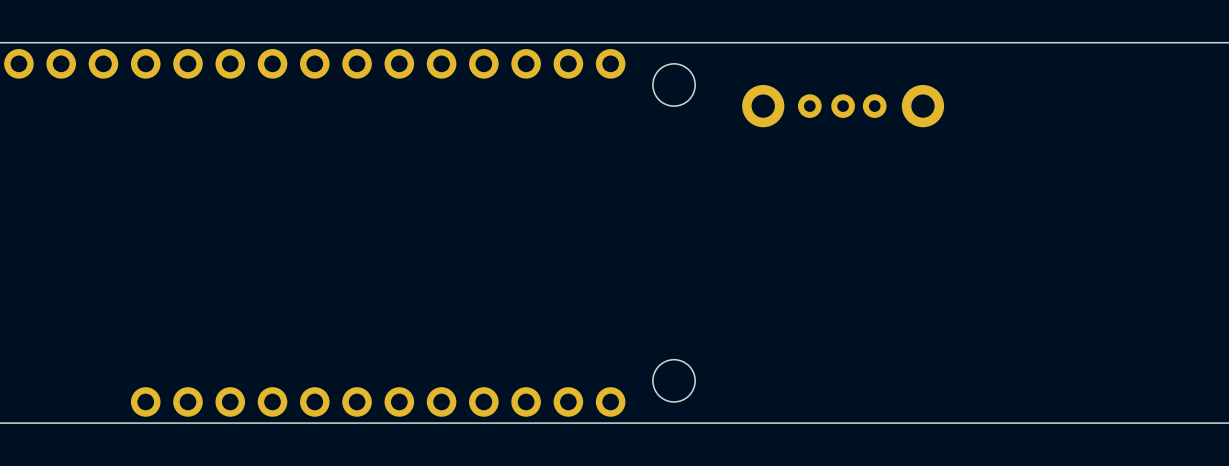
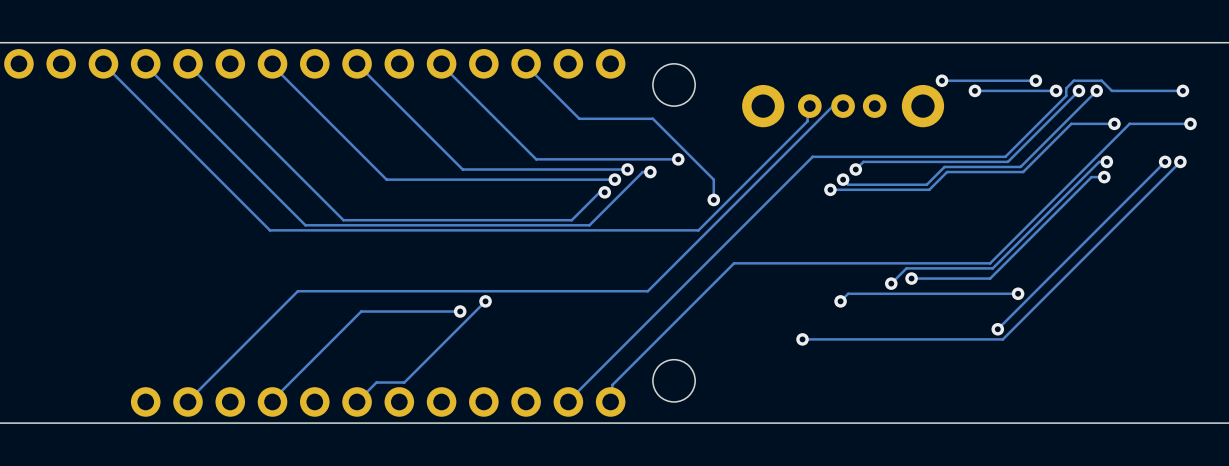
track: none -> (103, 63) (269, 230) (698, 230) (807, 121) (807, 106) (809, 106)
track: none -> (145, 63) (305, 225) (589, 225) (642, 172) (650, 172)
track: none -> (187, 63) (343, 220) (571, 220) (599, 192) (604, 192)
track: none -> (272, 63) (386, 179) (614, 179)
track: none -> (357, 63) (462, 169) (627, 169)
track: none -> (441, 63) (536, 159) (678, 159)
track: none -> (526, 63) (579, 118) (652, 118) (713, 179) (713, 199)
via: none -> (942, 80)
track: none -> (1035, 80) (942, 80)
via: none -> (1035, 80)
via: none -> (974, 90)
track: none -> (1056, 90) (974, 90)
via: none -> (1056, 90)
track: none -> (1078, 90) (1007, 161) (863, 161) (855, 169)
via: none -> (1078, 90)
track: none -> (1096, 90) (1020, 166) (944, 166) (926, 184) (848, 184) (843, 179)
via: none -> (1096, 90)
track: none -> (1182, 90) (1111, 90) (1101, 80) (1073, 80) (1066, 88) (1066, 95) (1005, 156) (812, 156) (568, 401)
via: none -> (1182, 90)
track: none -> (843, 106) (832, 106) (647, 291) (297, 291) (187, 401)
track: none -> (1114, 123) (1071, 123) (1023, 172) (947, 172) (929, 189) (830, 189)
via: none -> (1114, 123)
track: none -> (1190, 123) (1129, 123) (990, 263) (734, 263) (612, 385) (612, 400) (610, 401)
via: none -> (1190, 123)
via: none -> (678, 159)
track: none -> (1106, 161) (1099, 161) (992, 268) (906, 268) (891, 283)
via: none -> (1106, 161)
track: none -> (1165, 161) (997, 329)
via: none -> (1165, 161)
track: none -> (1180, 161) (1002, 339) (802, 339)
via: none -> (1180, 161)
via: none -> (627, 169)
via: none -> (855, 169)
via: none -> (650, 172)
track: none -> (1104, 177) (1091, 177) (990, 278) (911, 278)
via: none -> (1104, 177)
via: none -> (614, 179)
via: none -> (843, 179)
via: none -> (830, 189)
via: none -> (604, 192)
via: none -> (713, 199)
via: none -> (911, 278)
via: none -> (891, 283)
track: none -> (1018, 293) (848, 293) (840, 301)
via: none -> (1018, 293)
track: none -> (485, 301) (404, 382) (376, 382) (357, 401)
via: none -> (485, 301)
via: none -> (840, 301)
track: none -> (460, 311) (361, 311) (272, 401)
via: none -> (460, 311)
via: none -> (997, 329)
via: none -> (802, 339)

